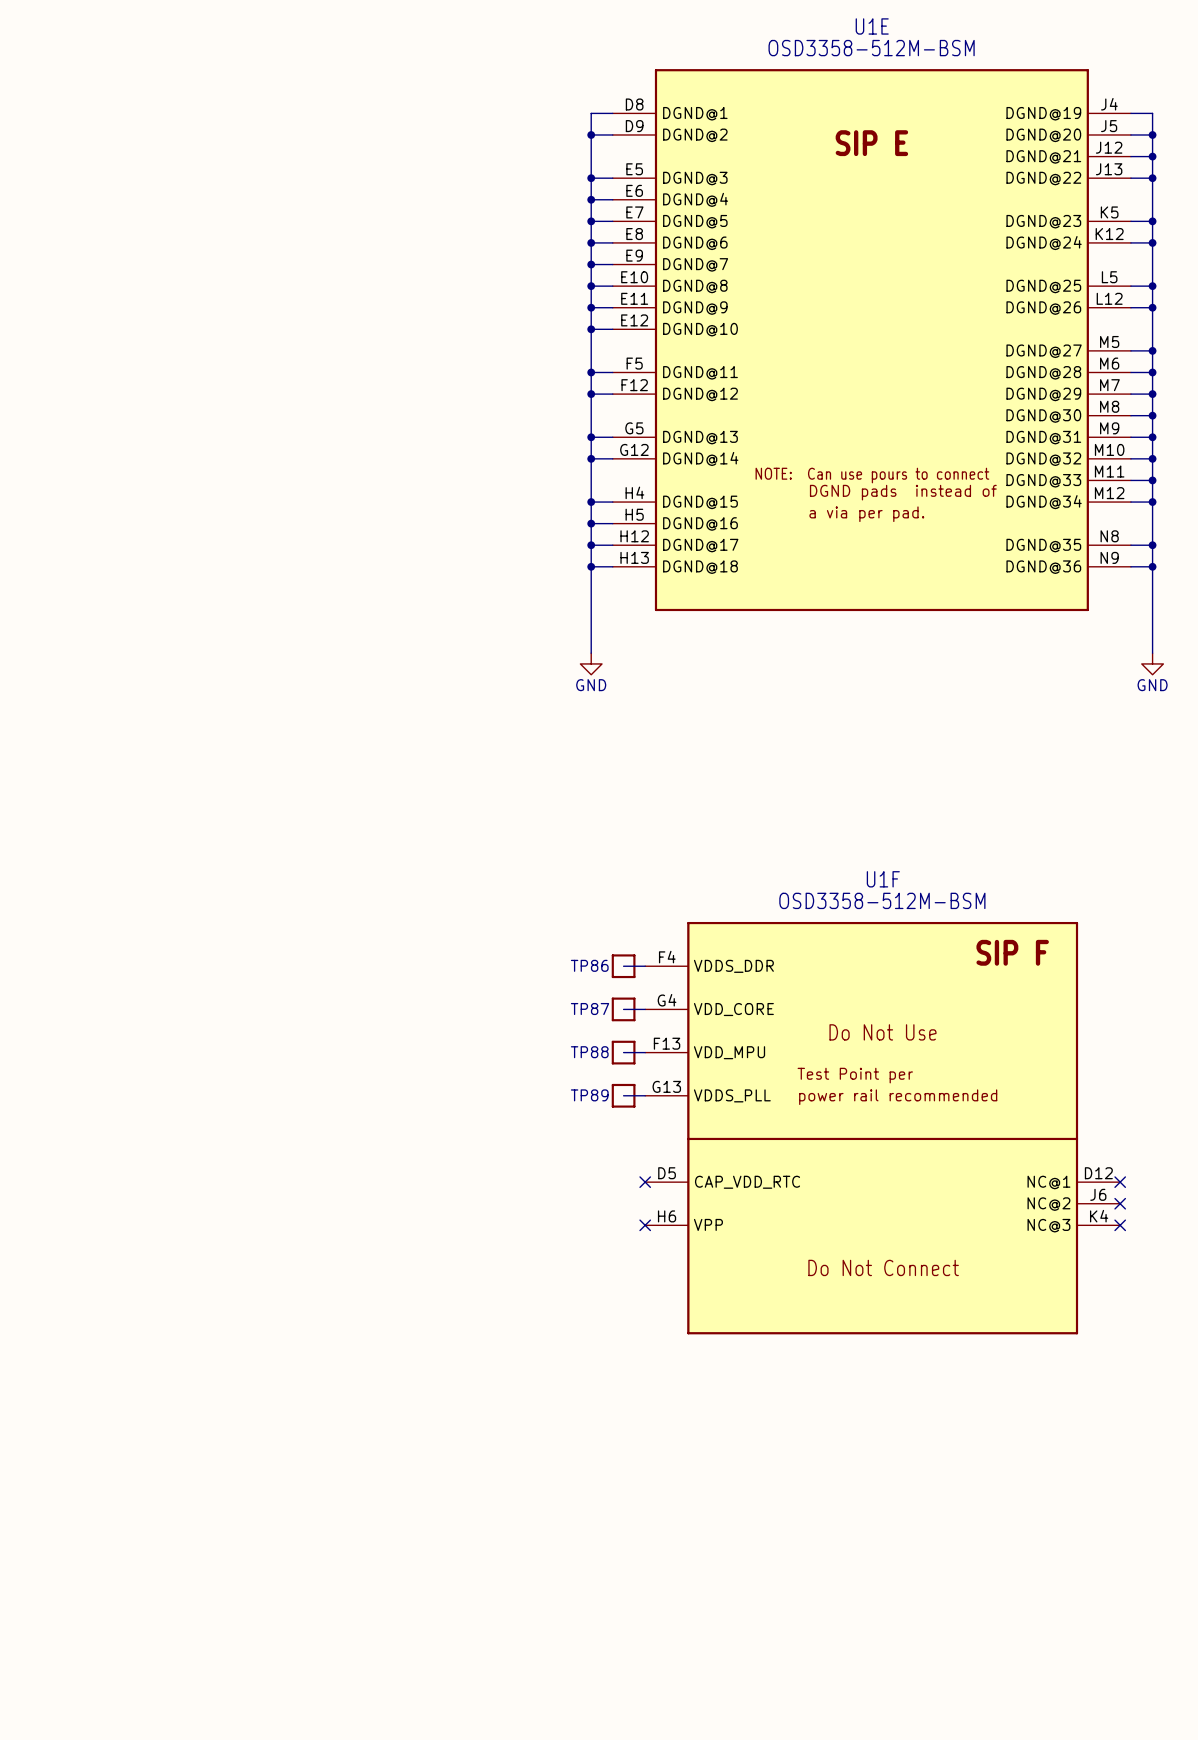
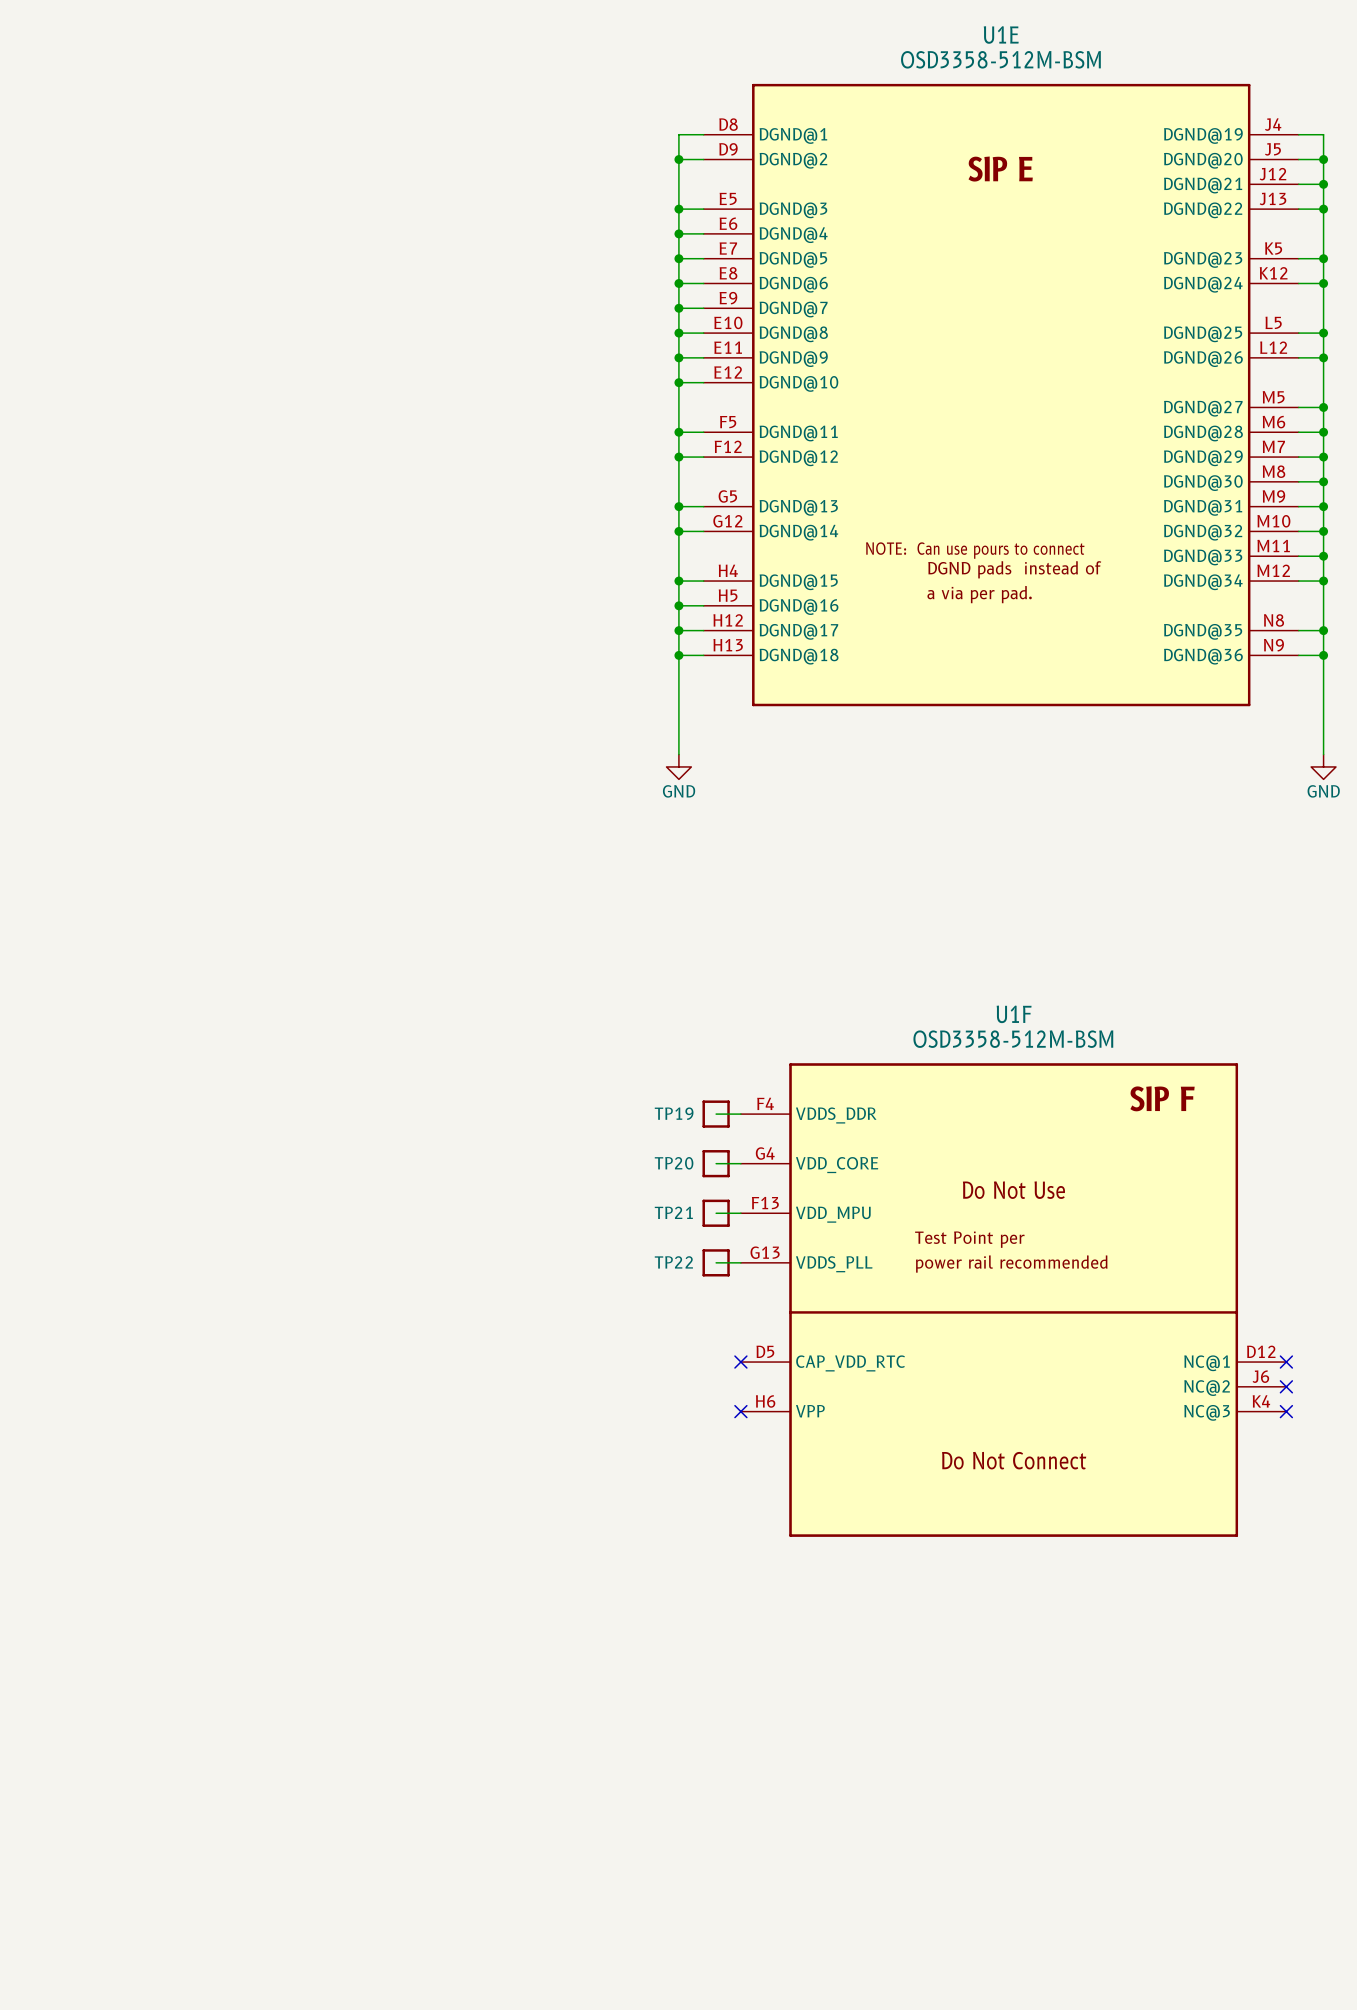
TP86 name: TP86 (589, 965) -> TP19 (674, 1113)
TP87 name: TP87 (590, 1009) -> TP20 (674, 1163)
TP88 name: TP88 (589, 1052) -> TP21 (673, 1212)
TP89 name: TP89 (589, 1095) -> TP22 (673, 1262)

